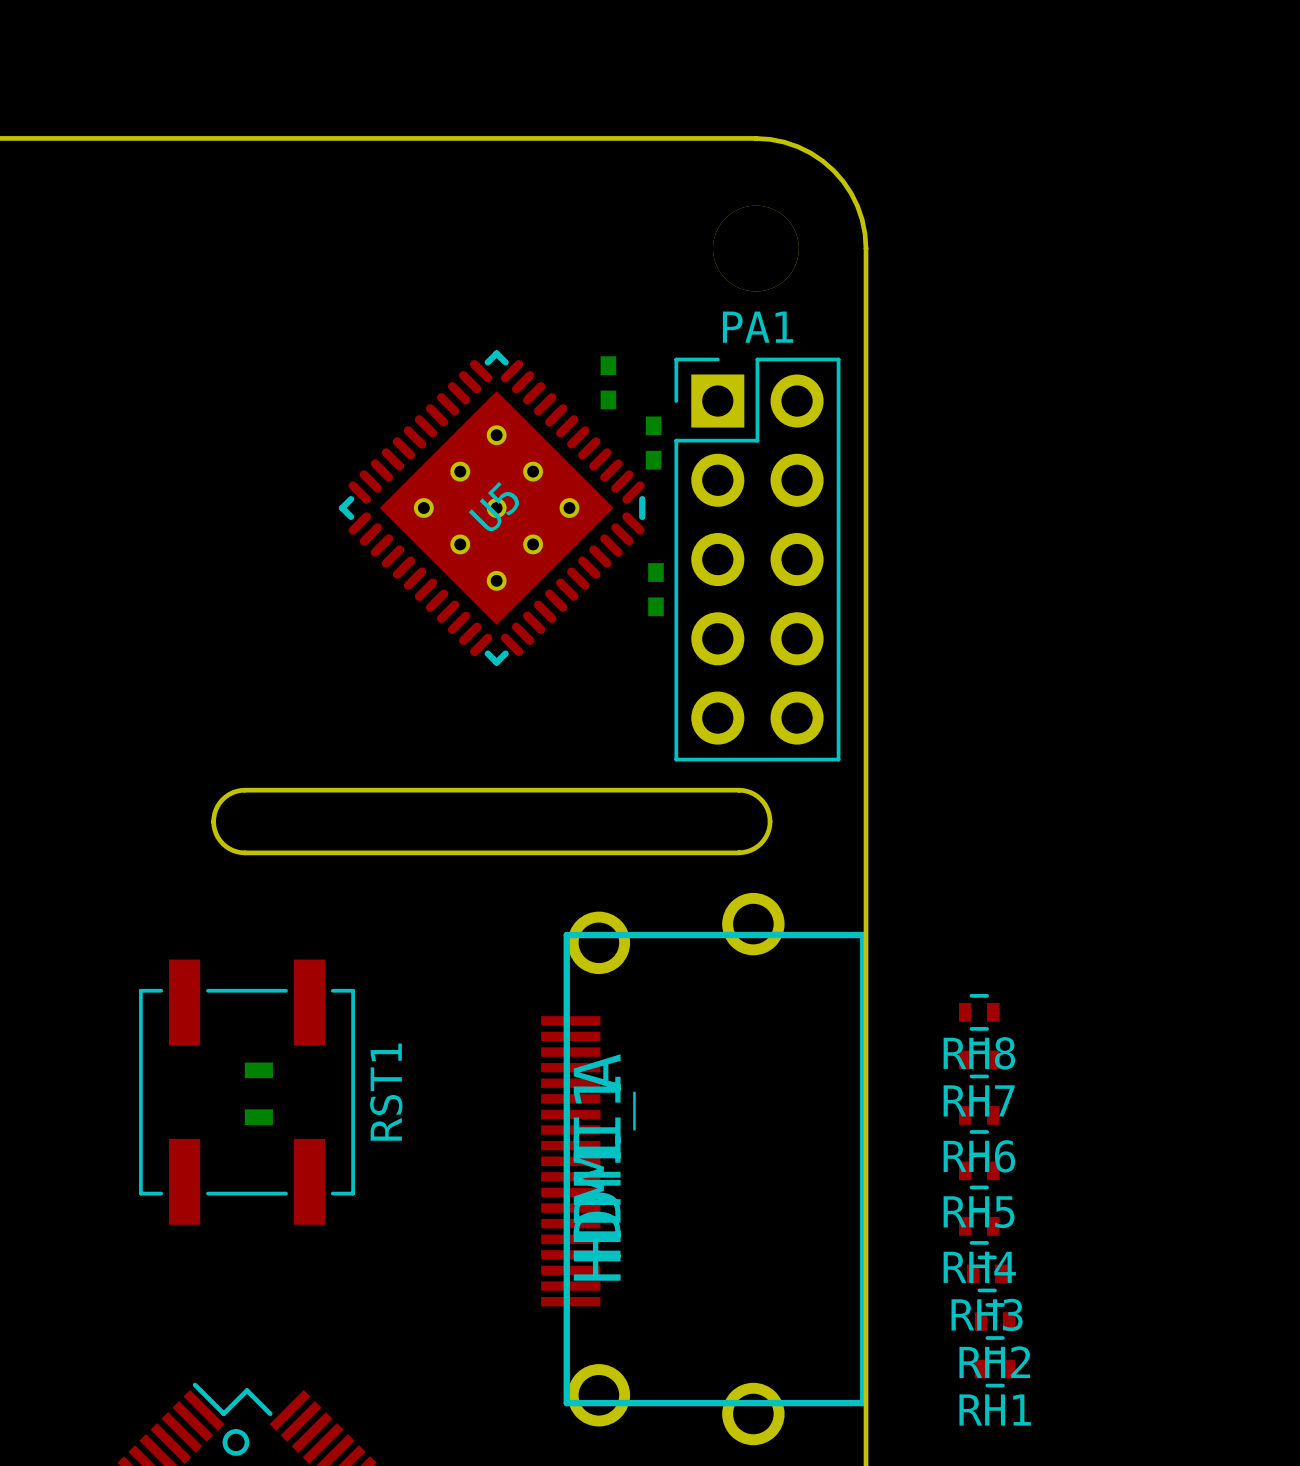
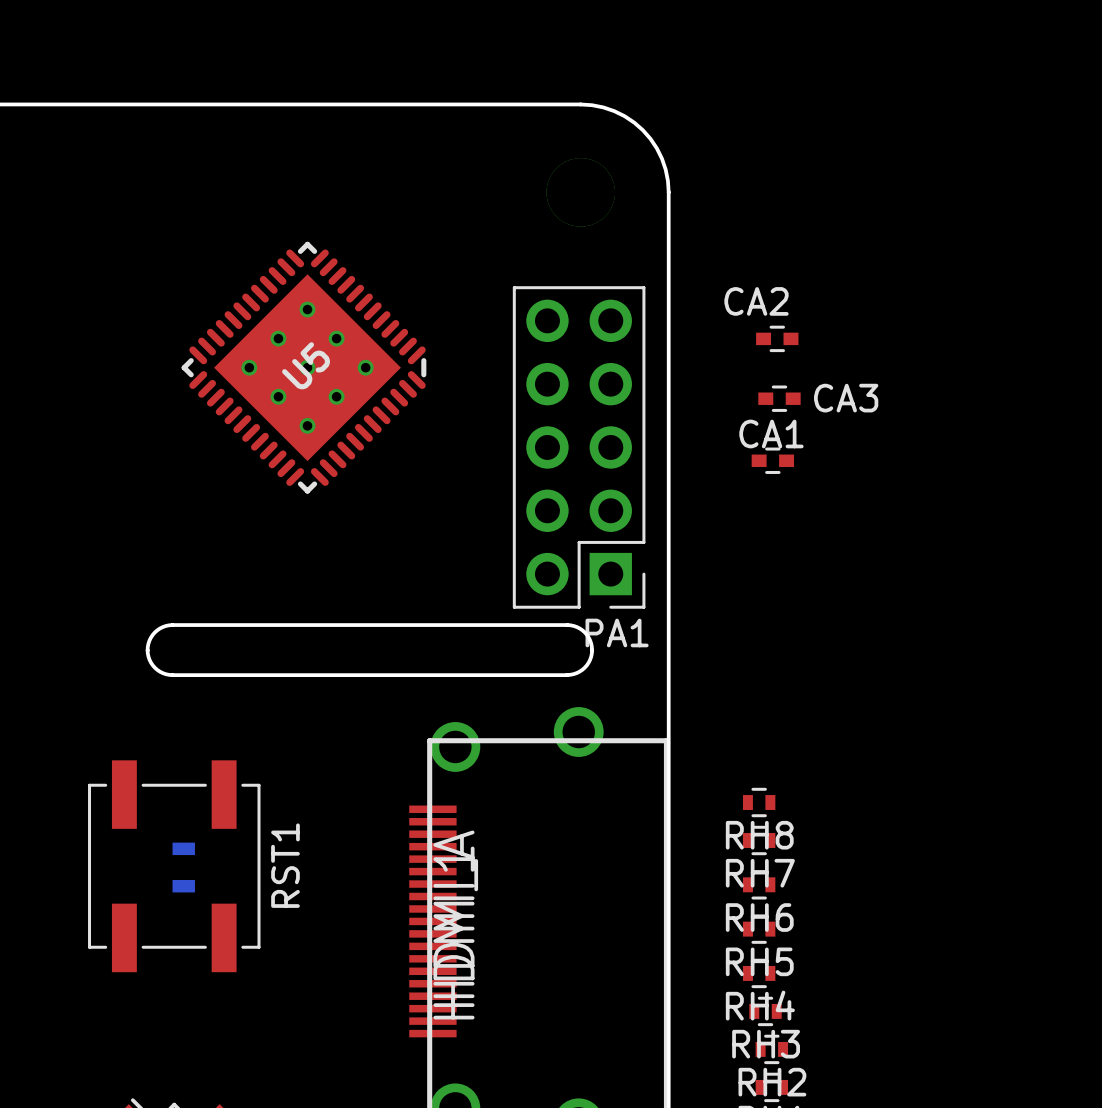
CA2 side: bottom (608, 382) -> top (777, 338)
CA3 side: bottom (653, 443) -> top (779, 398)
U5 position: (492, 508) -> (303, 367)
PA1 rotation: 0° (757, 559) -> 180° (579, 447)
CA1 side: bottom (655, 589) -> top (772, 460)

